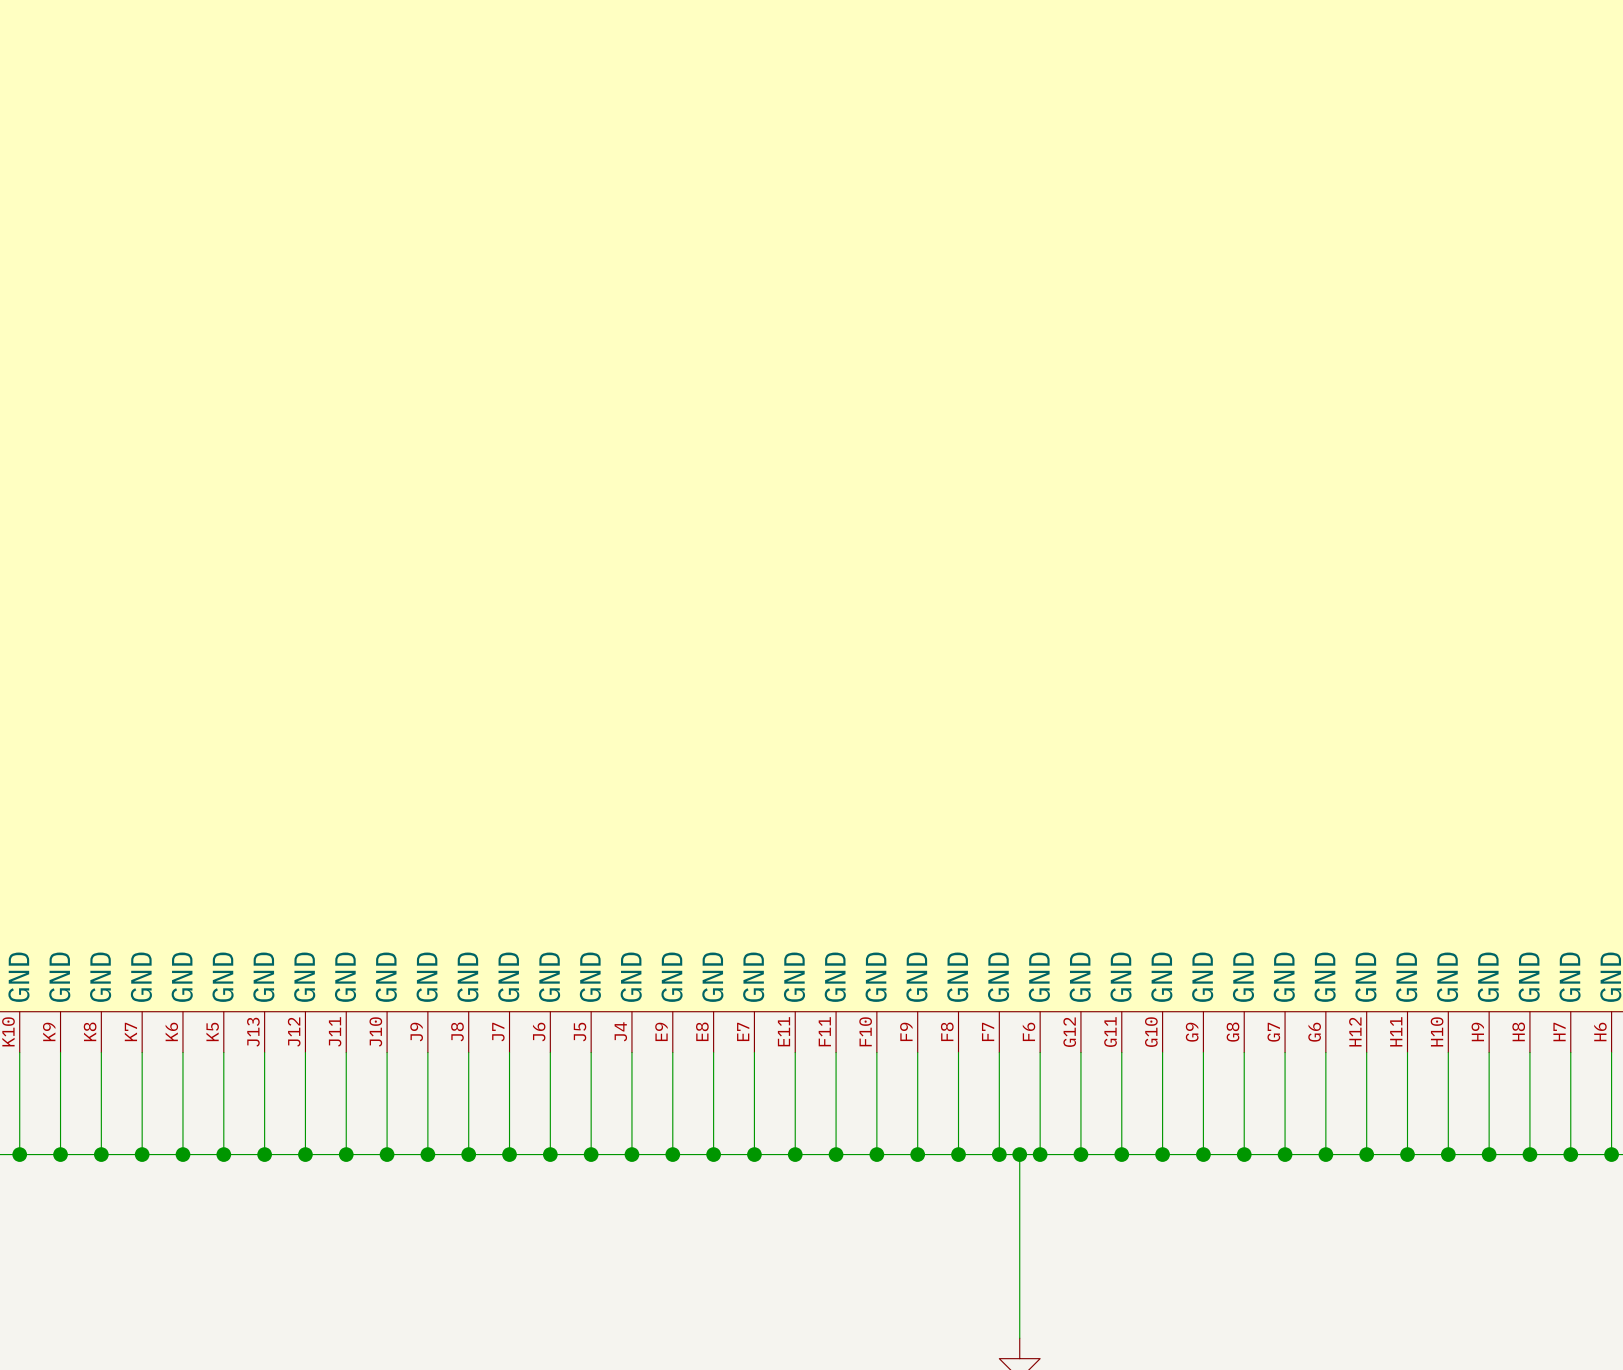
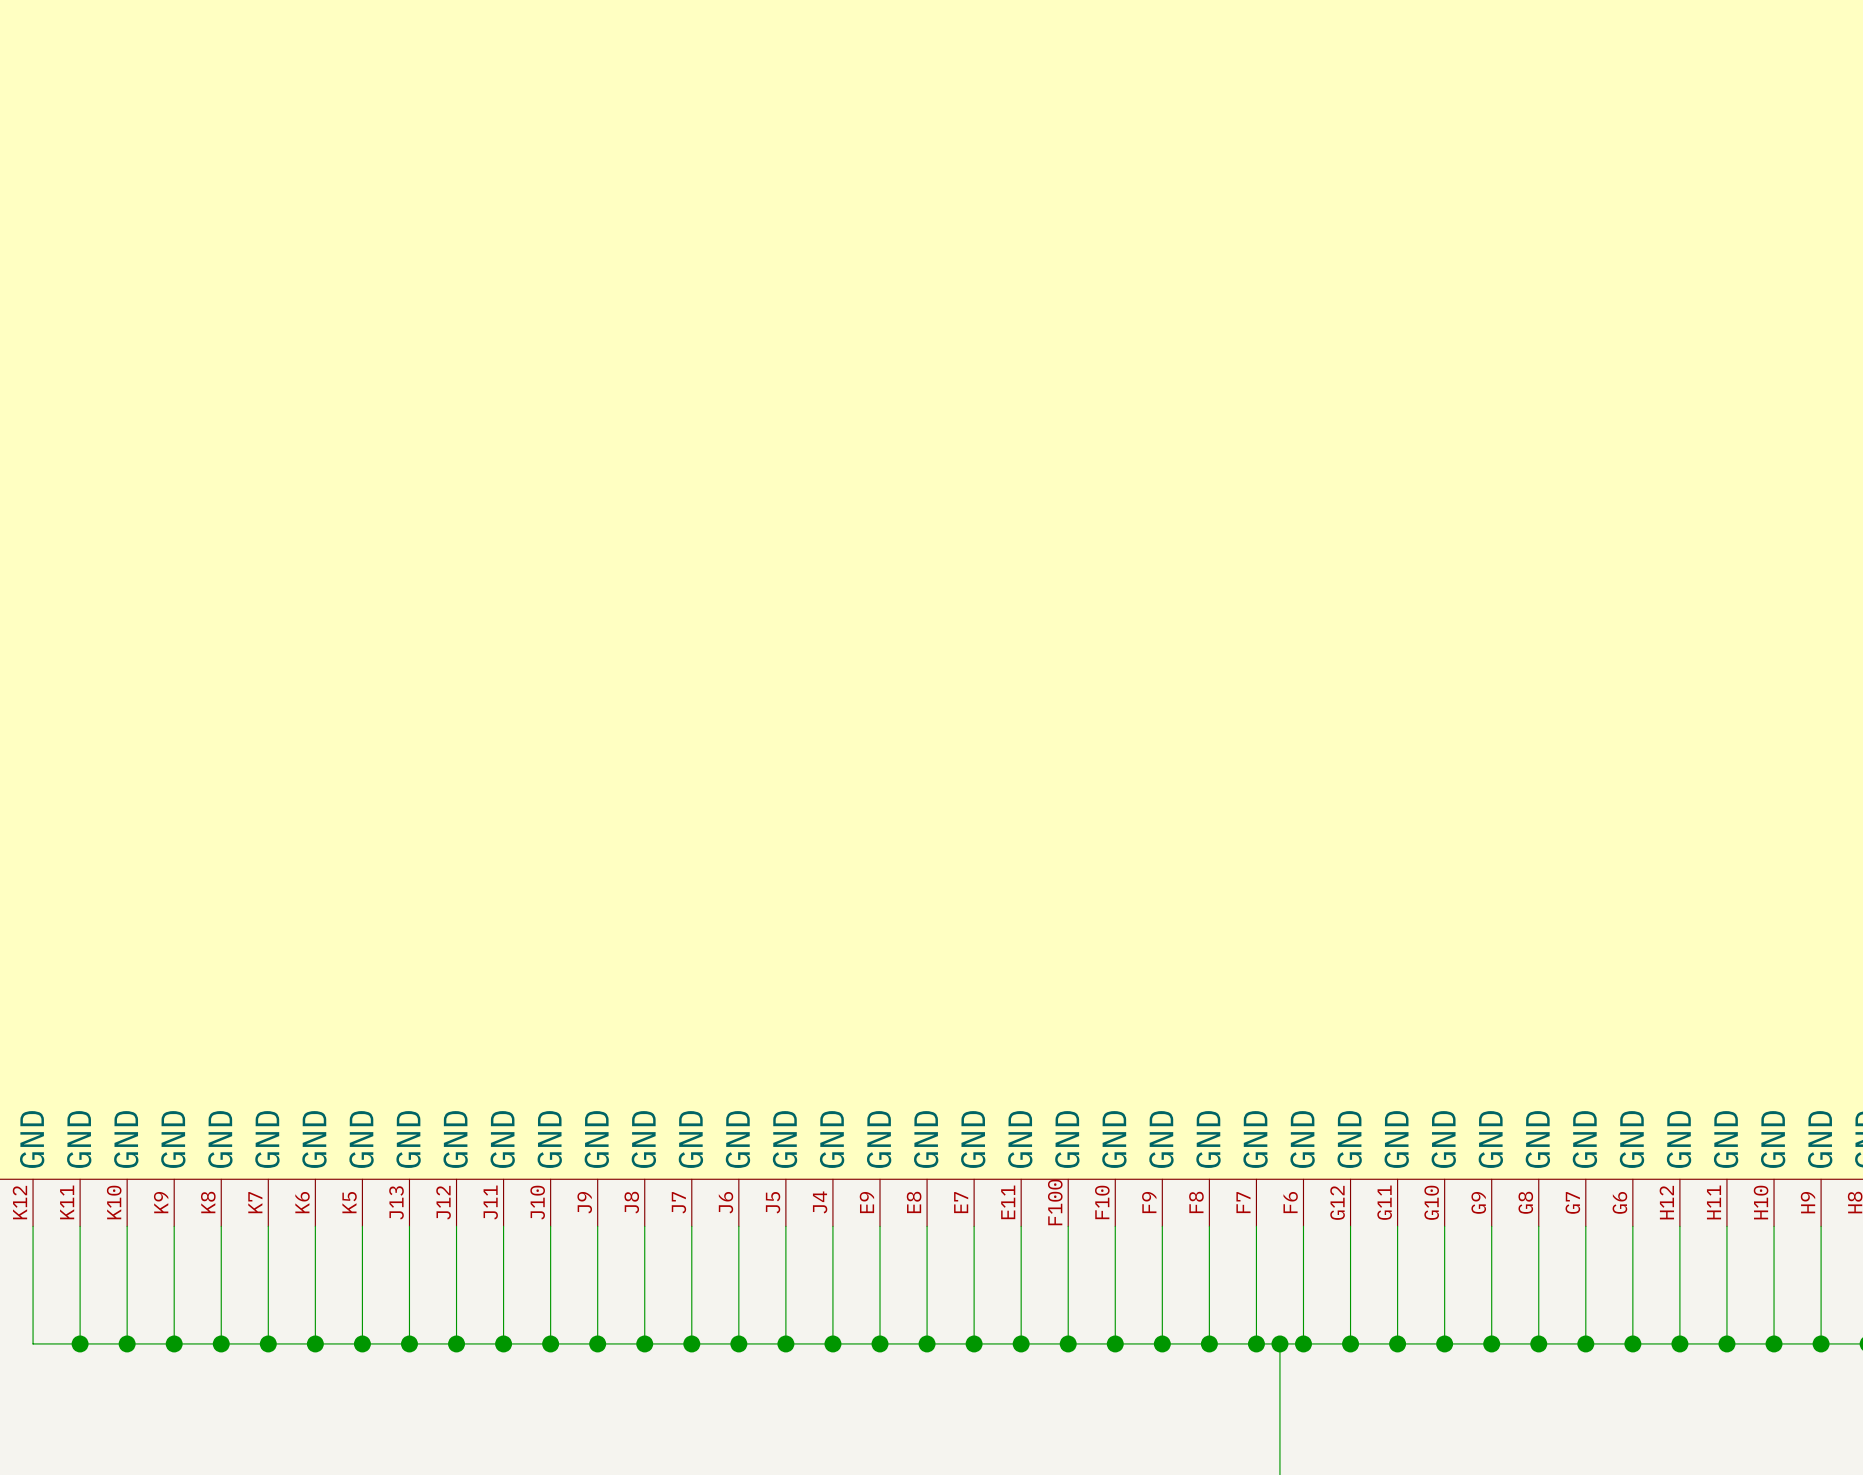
part pin number: F11 (824, 1031) -> F100 (1055, 1202)

